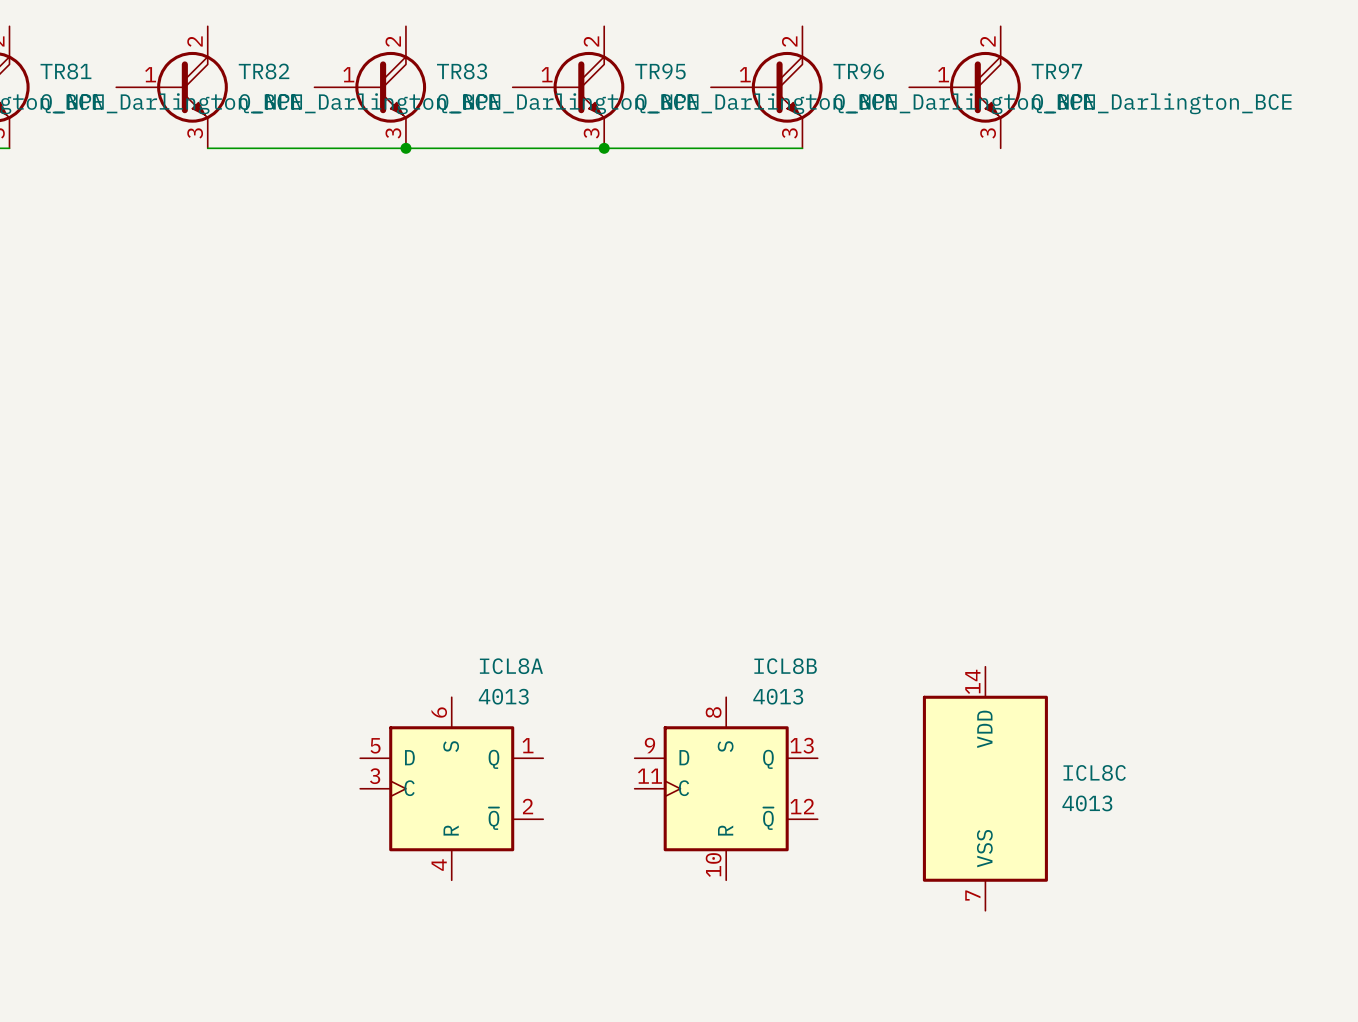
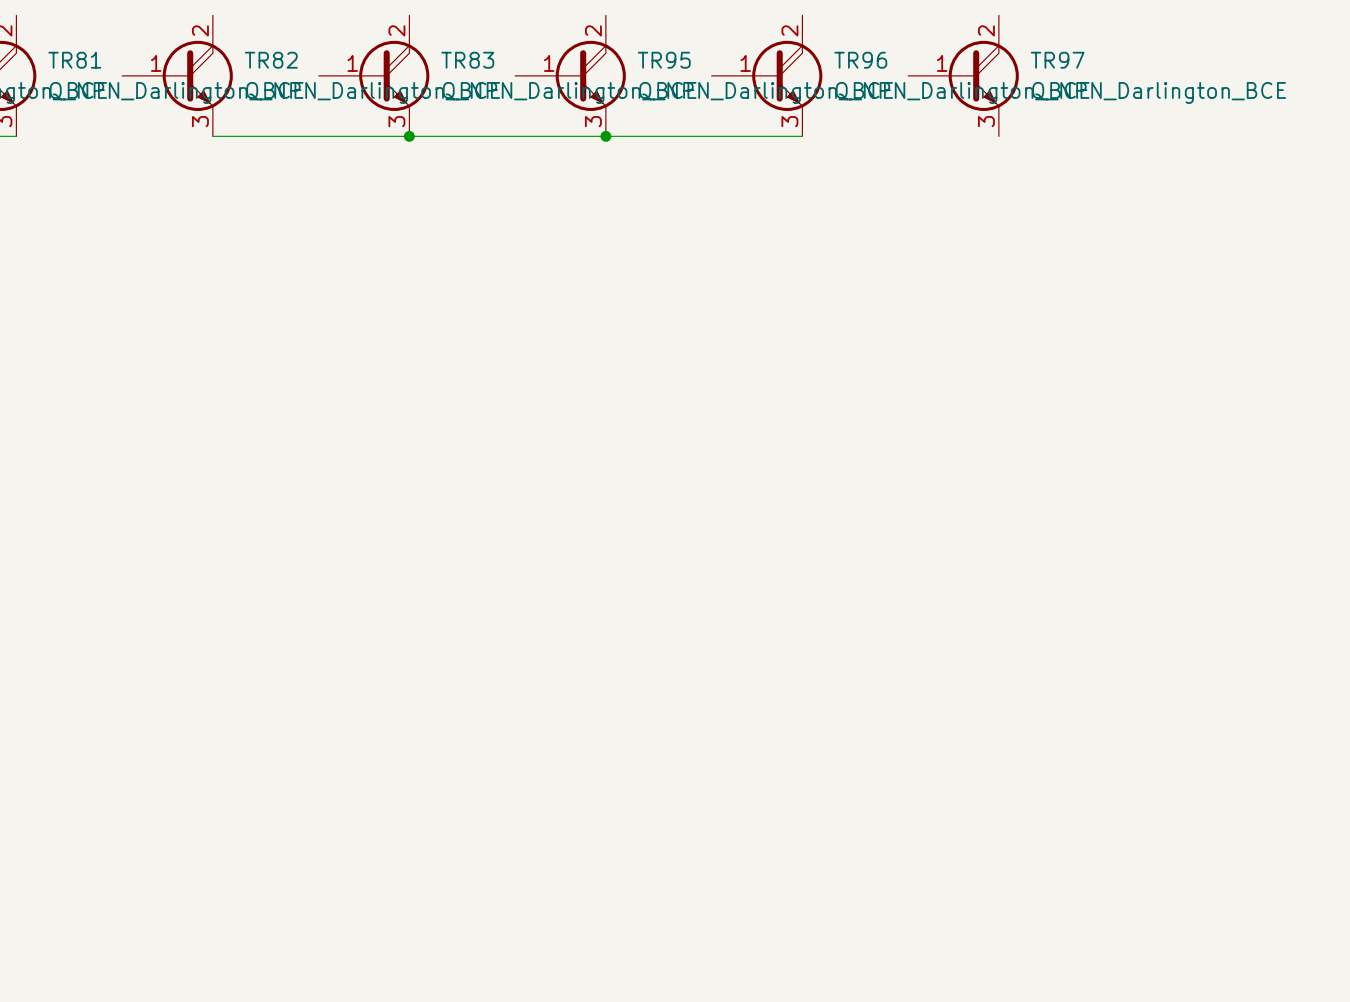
ICL8A: 4013 (451, 788) -> none
ICL8B: 4013 (726, 788) -> none
ICL8C: 4013 (985, 788) -> none

